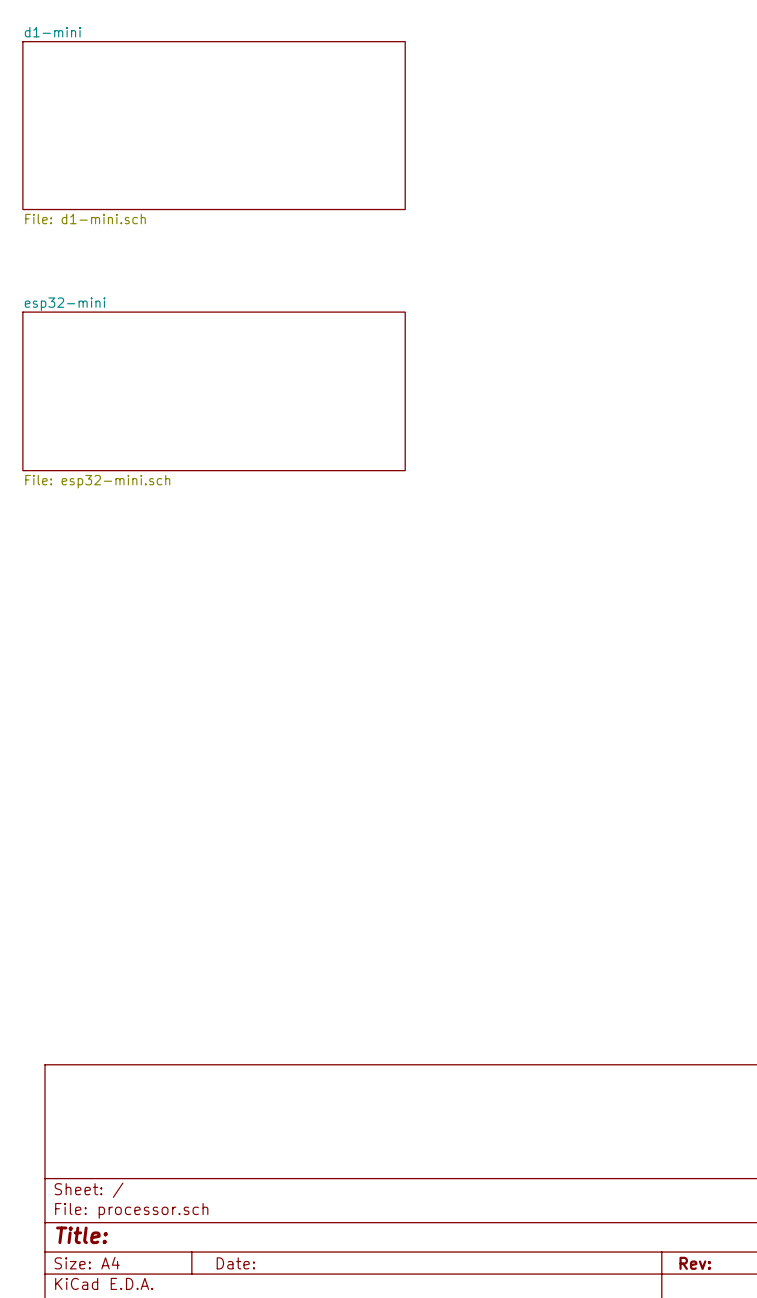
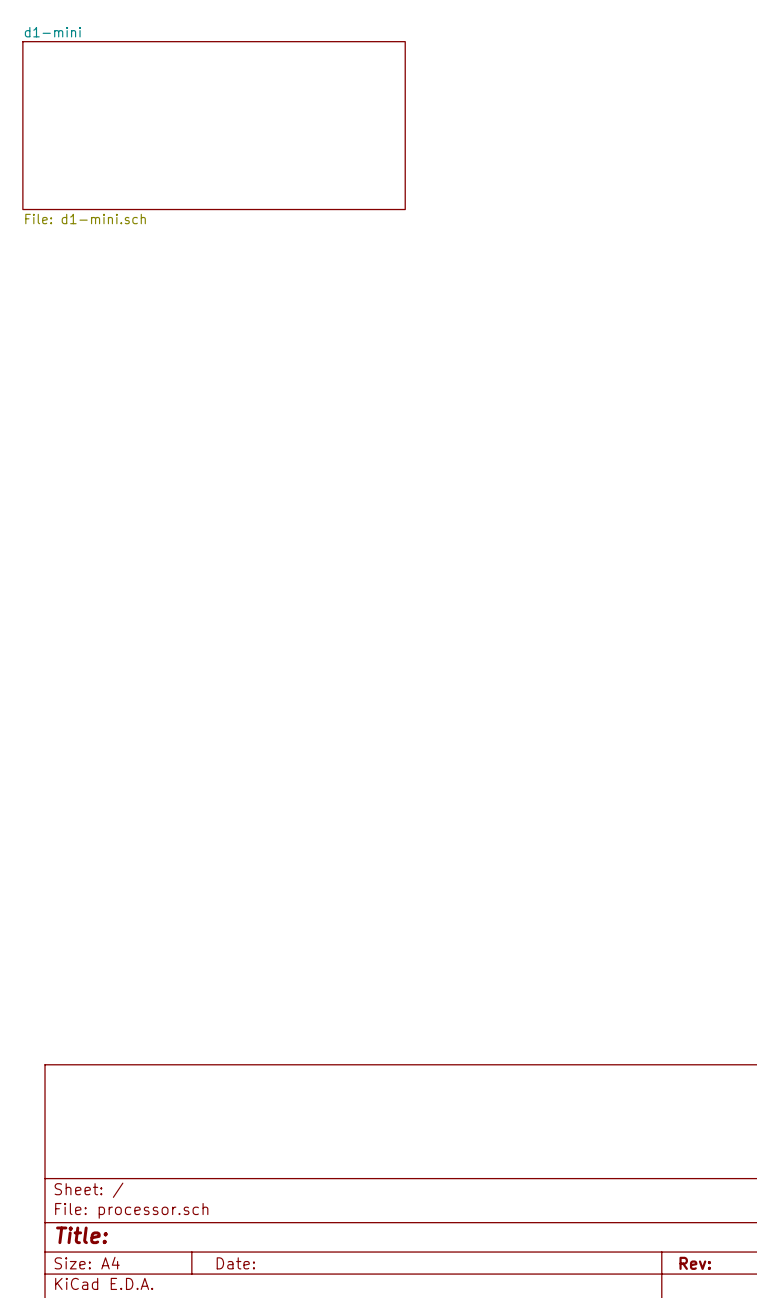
sheet esp32-mini: File: esp32-mini.sch (214, 391) -> none

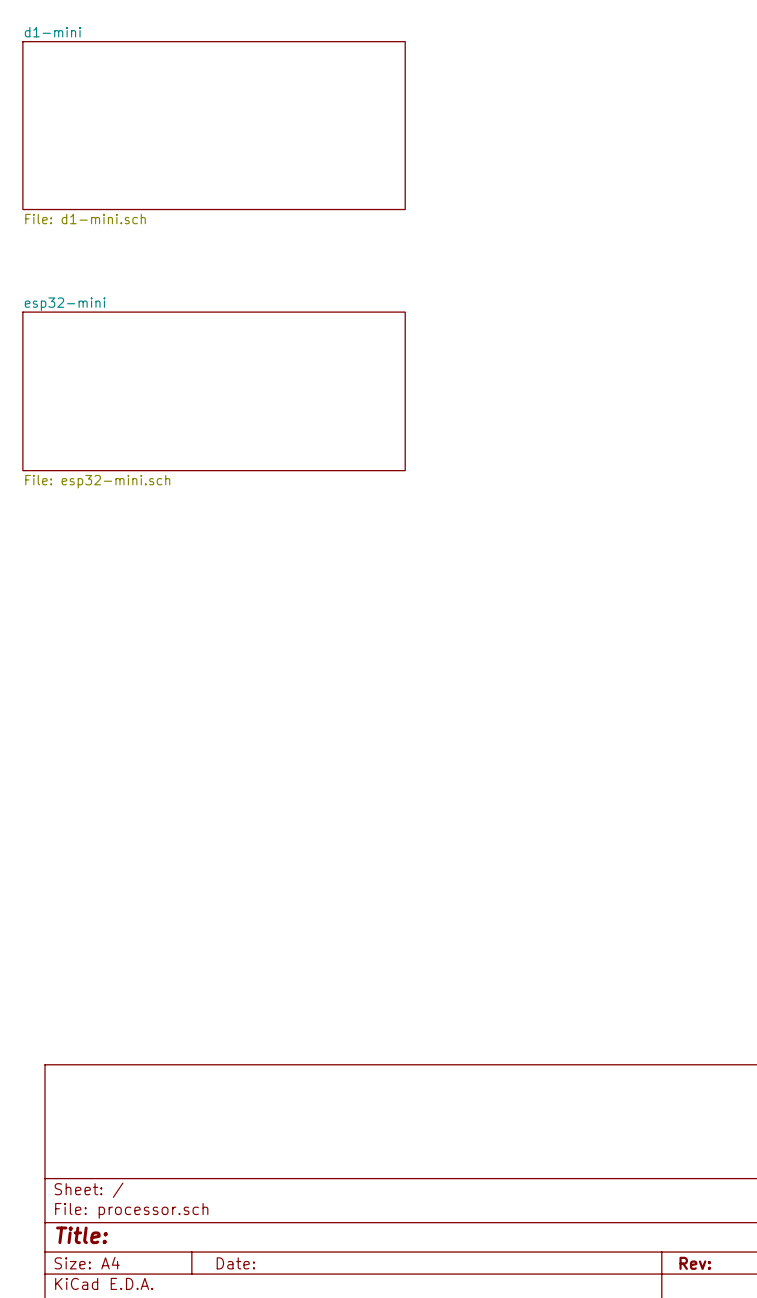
sheet esp32-mini: none -> File: esp32-mini.sch (214, 391)

